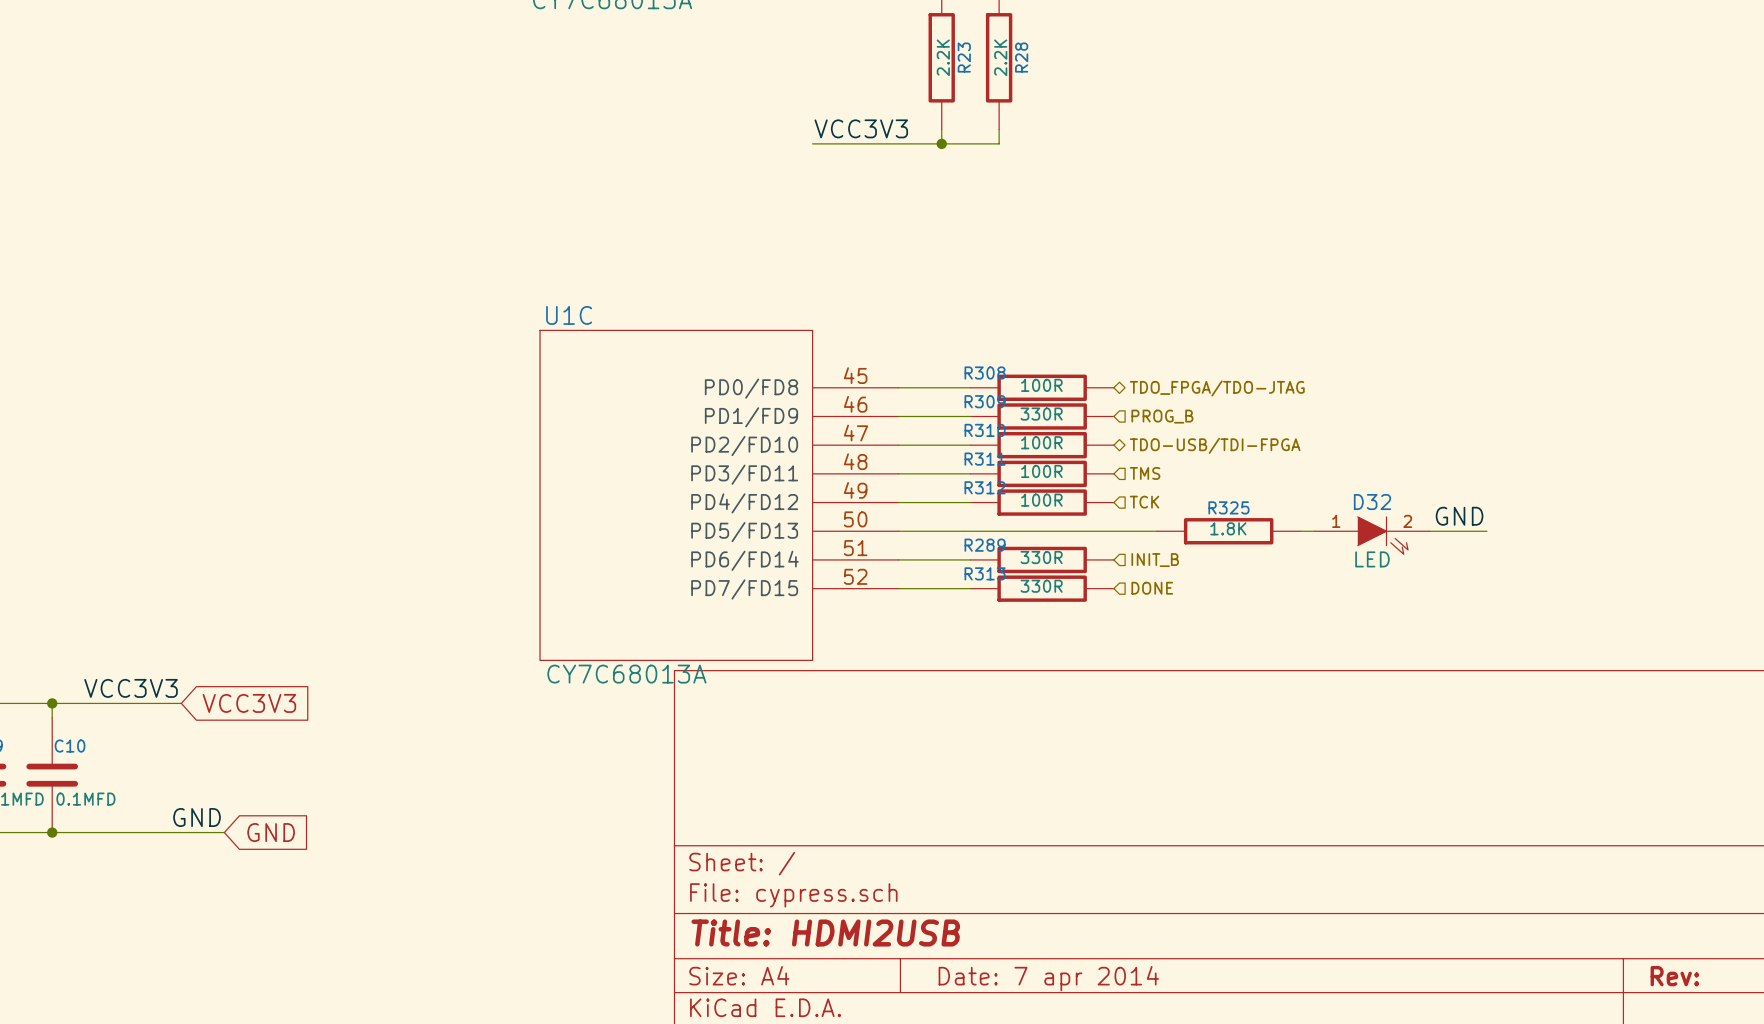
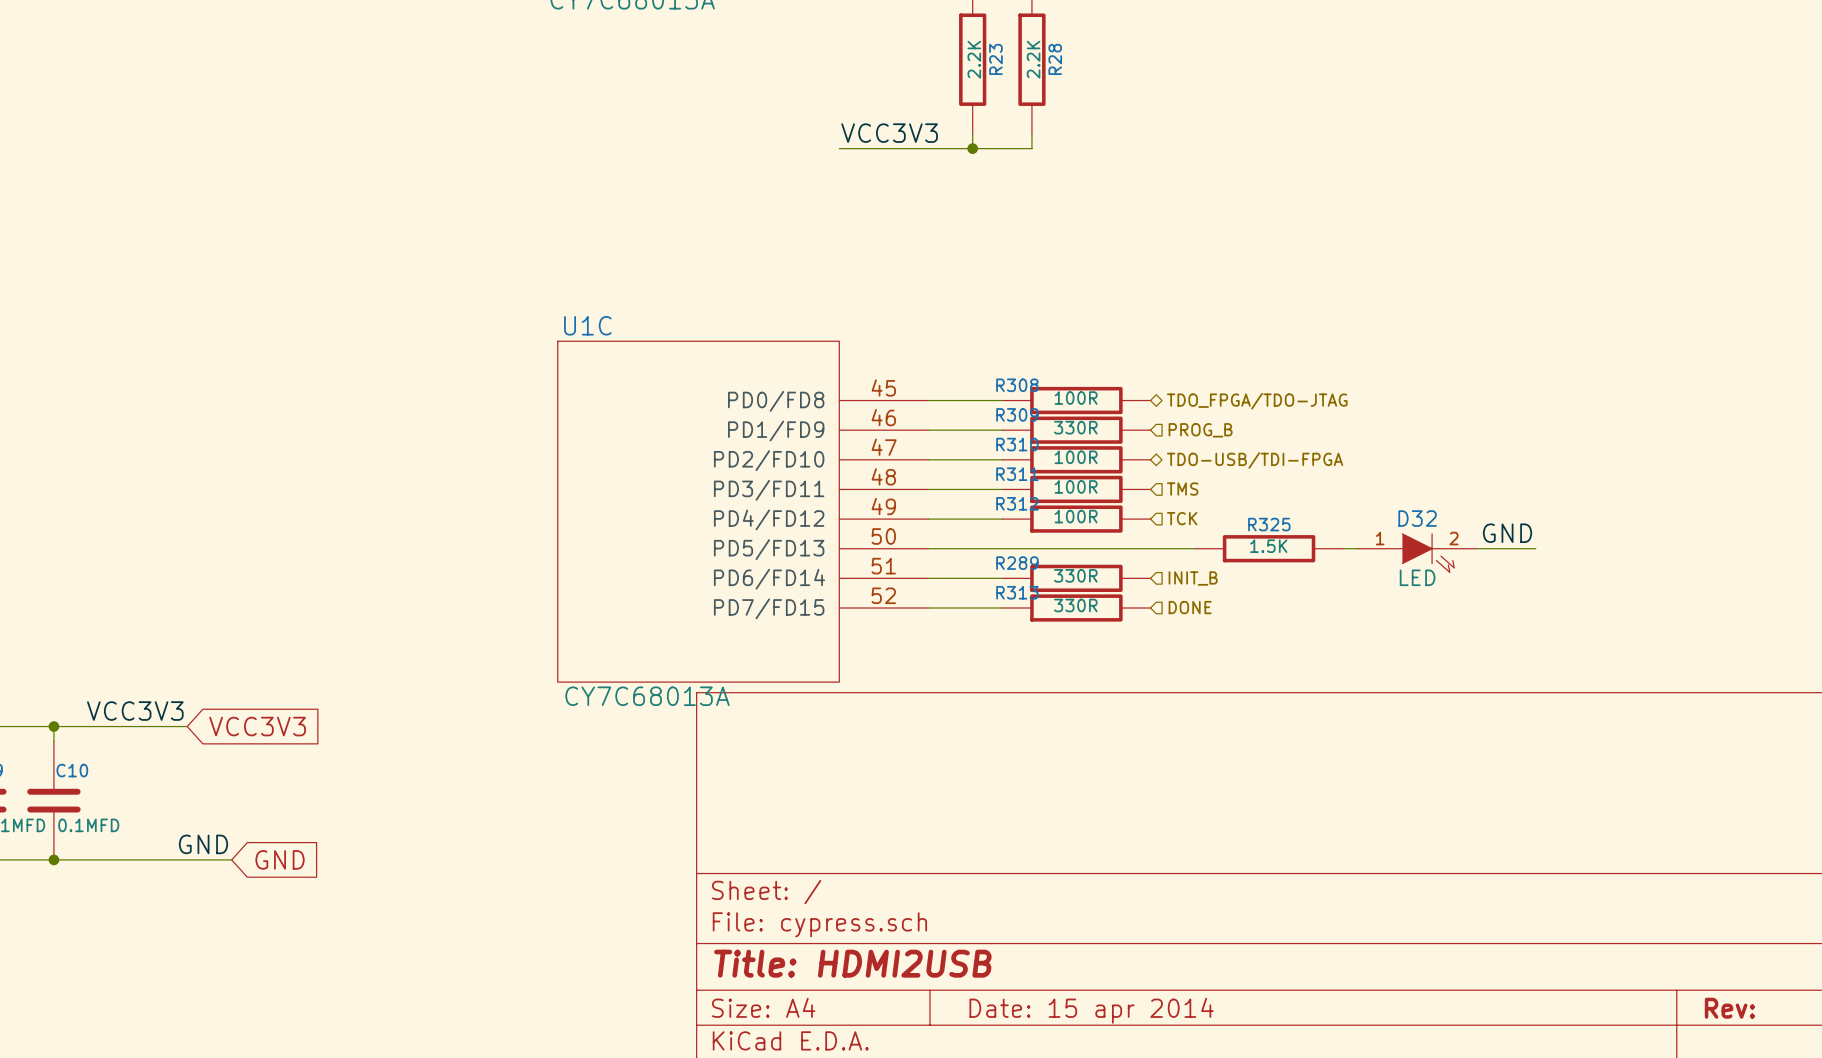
R325 value: 1.8K (1228, 528) -> 1.5K (1268, 546)
title block: Date: 7 apr 2014 (1048, 978) -> Date: 15 apr 2014 (1091, 1010)

